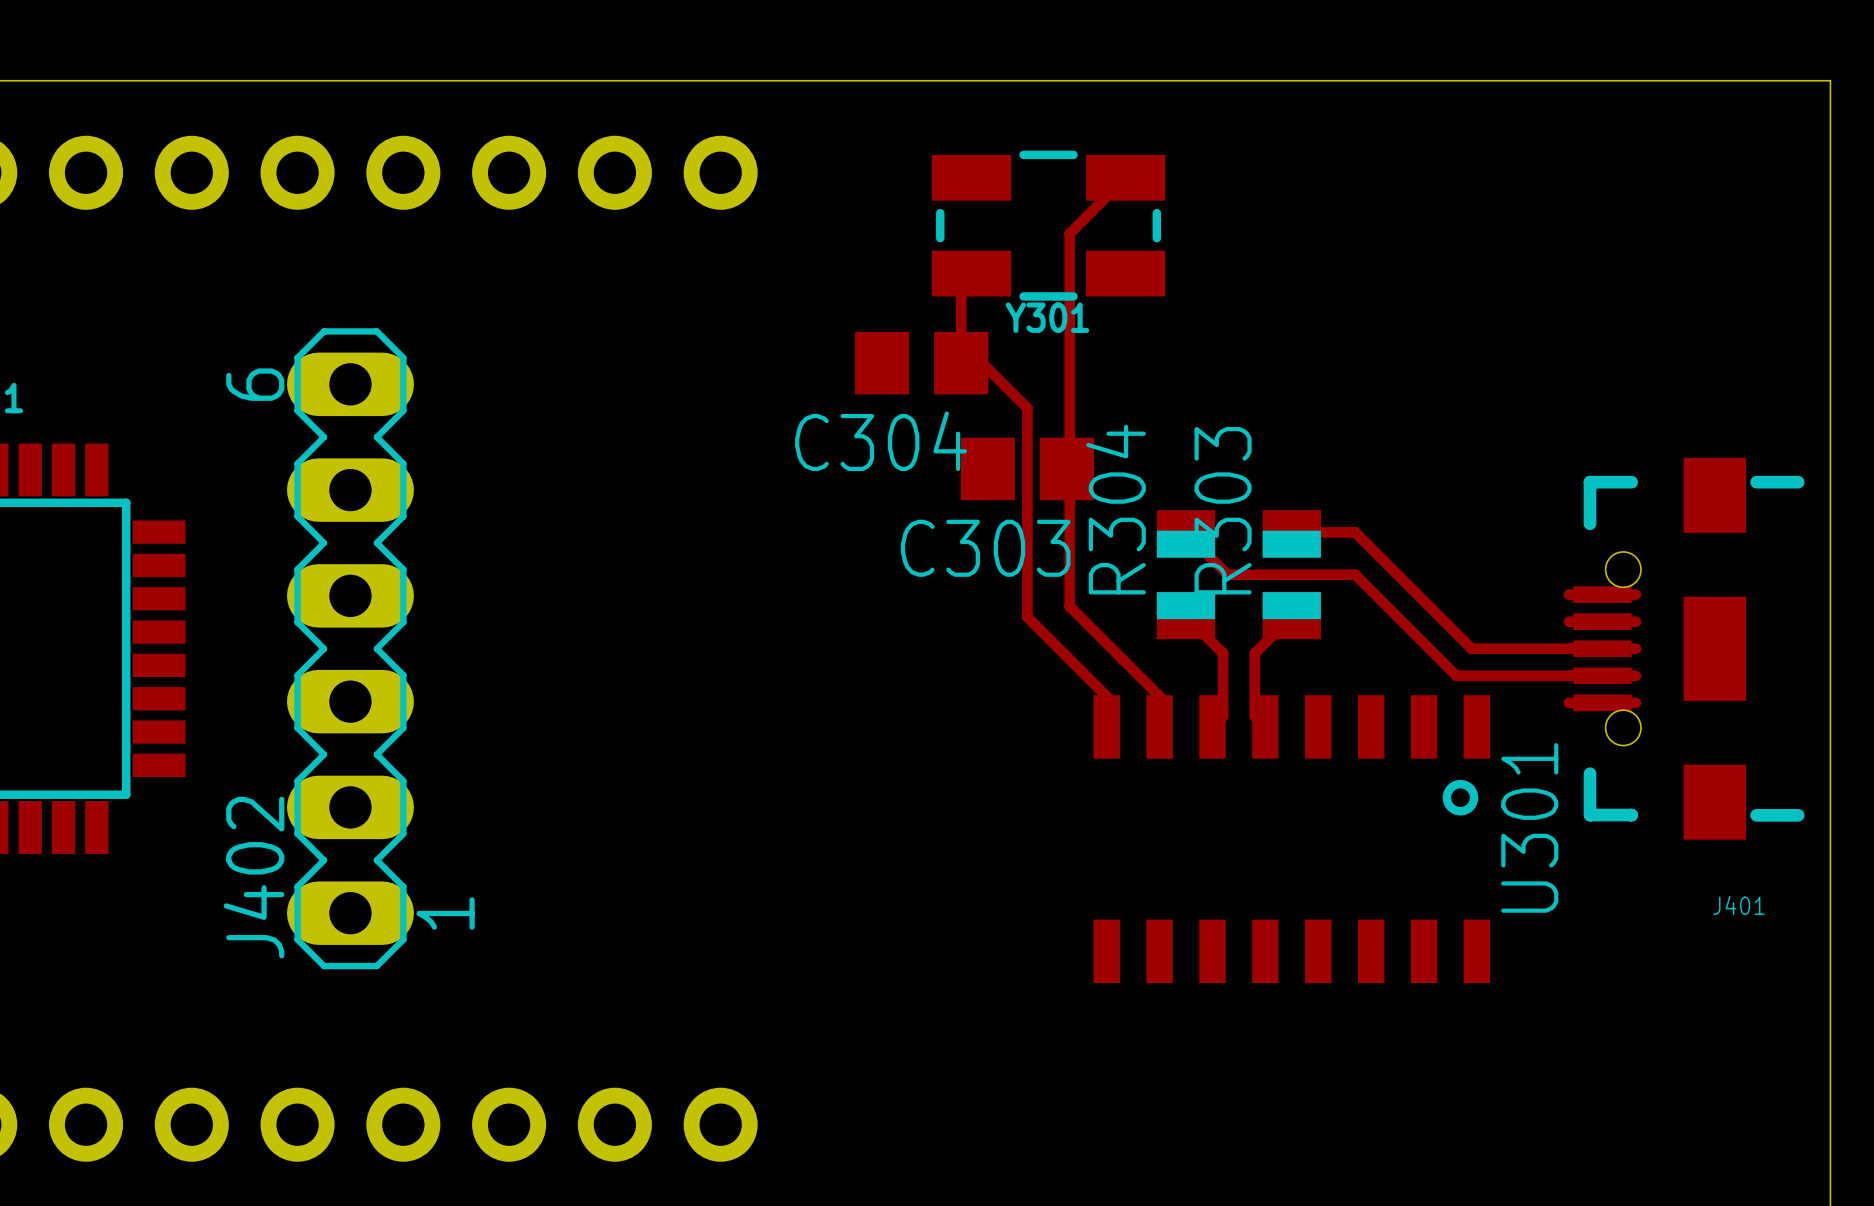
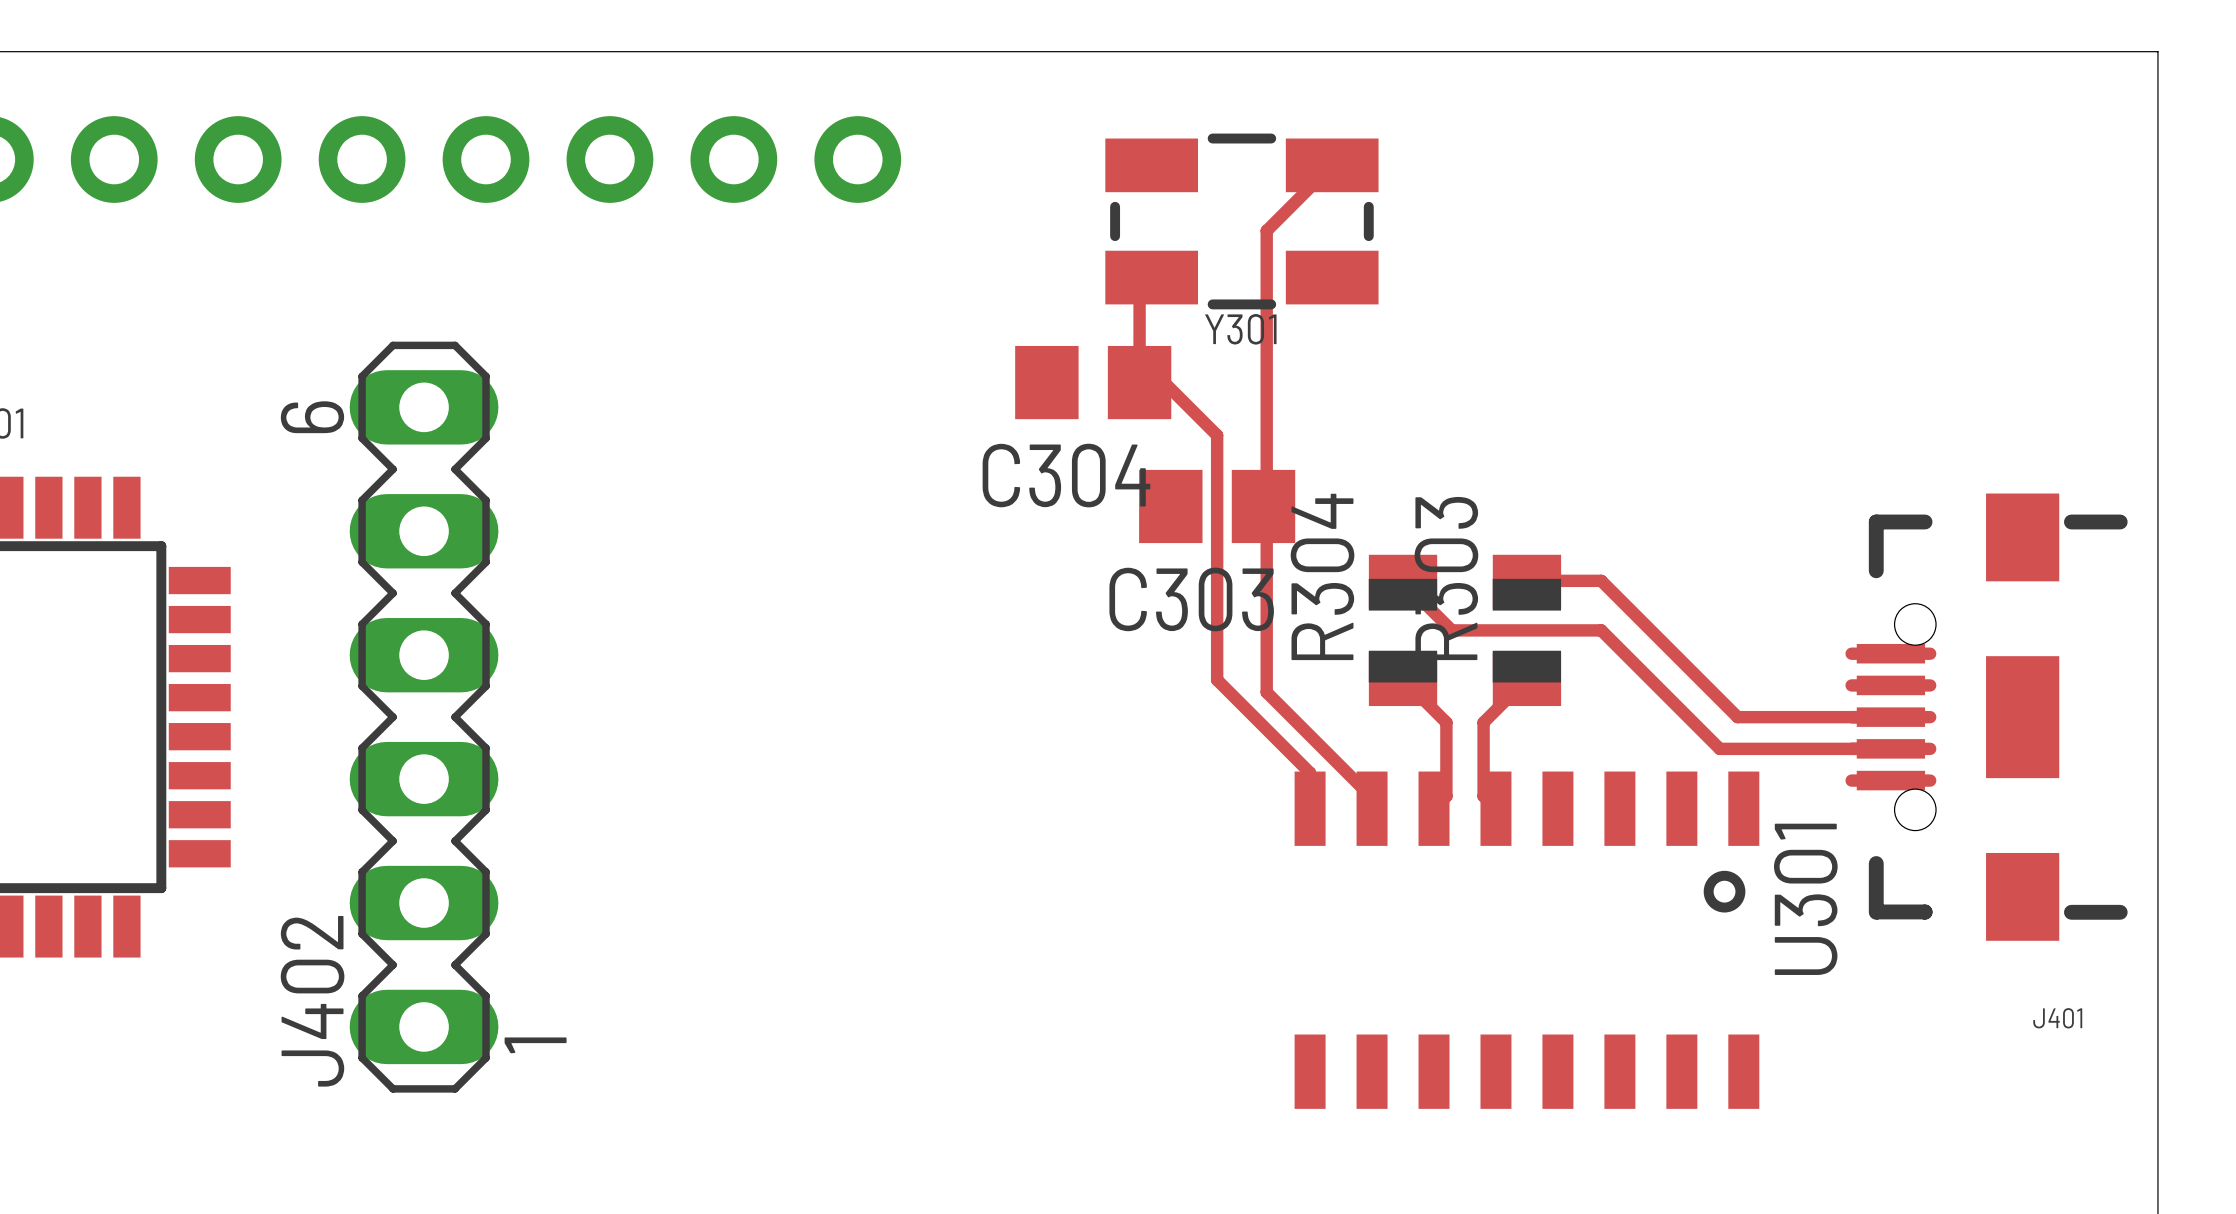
track: (1069, 606) (1159, 696) (1159, 717) -> (1266, 667) (1266, 692) (1372, 797)

